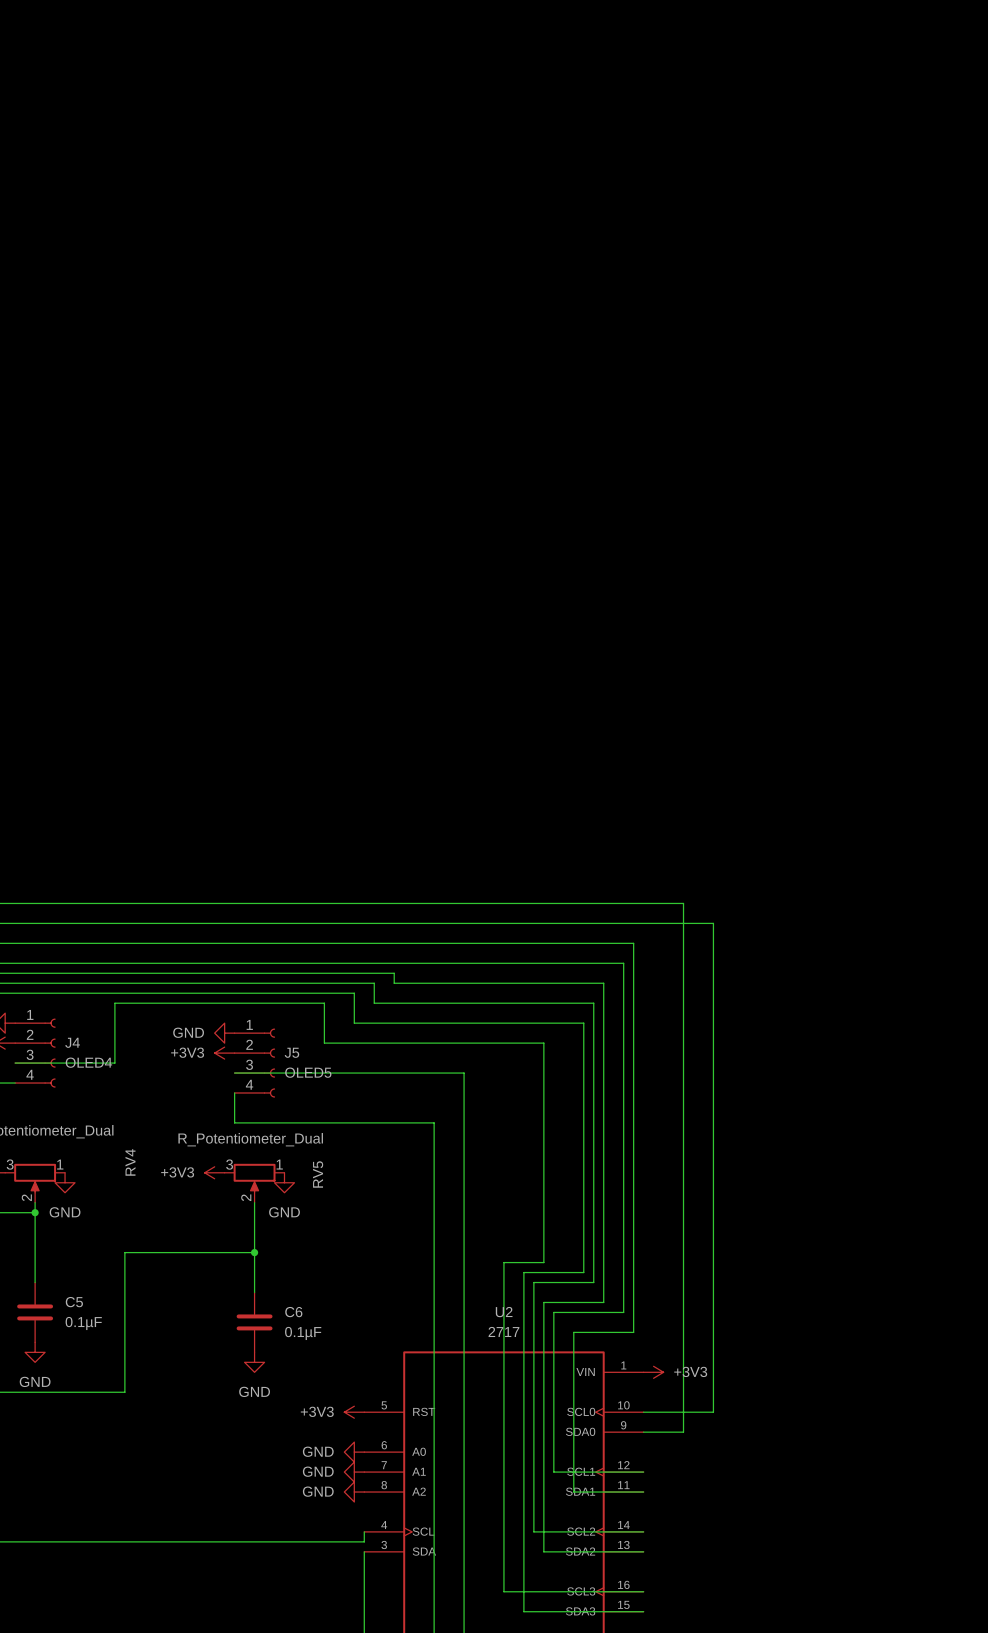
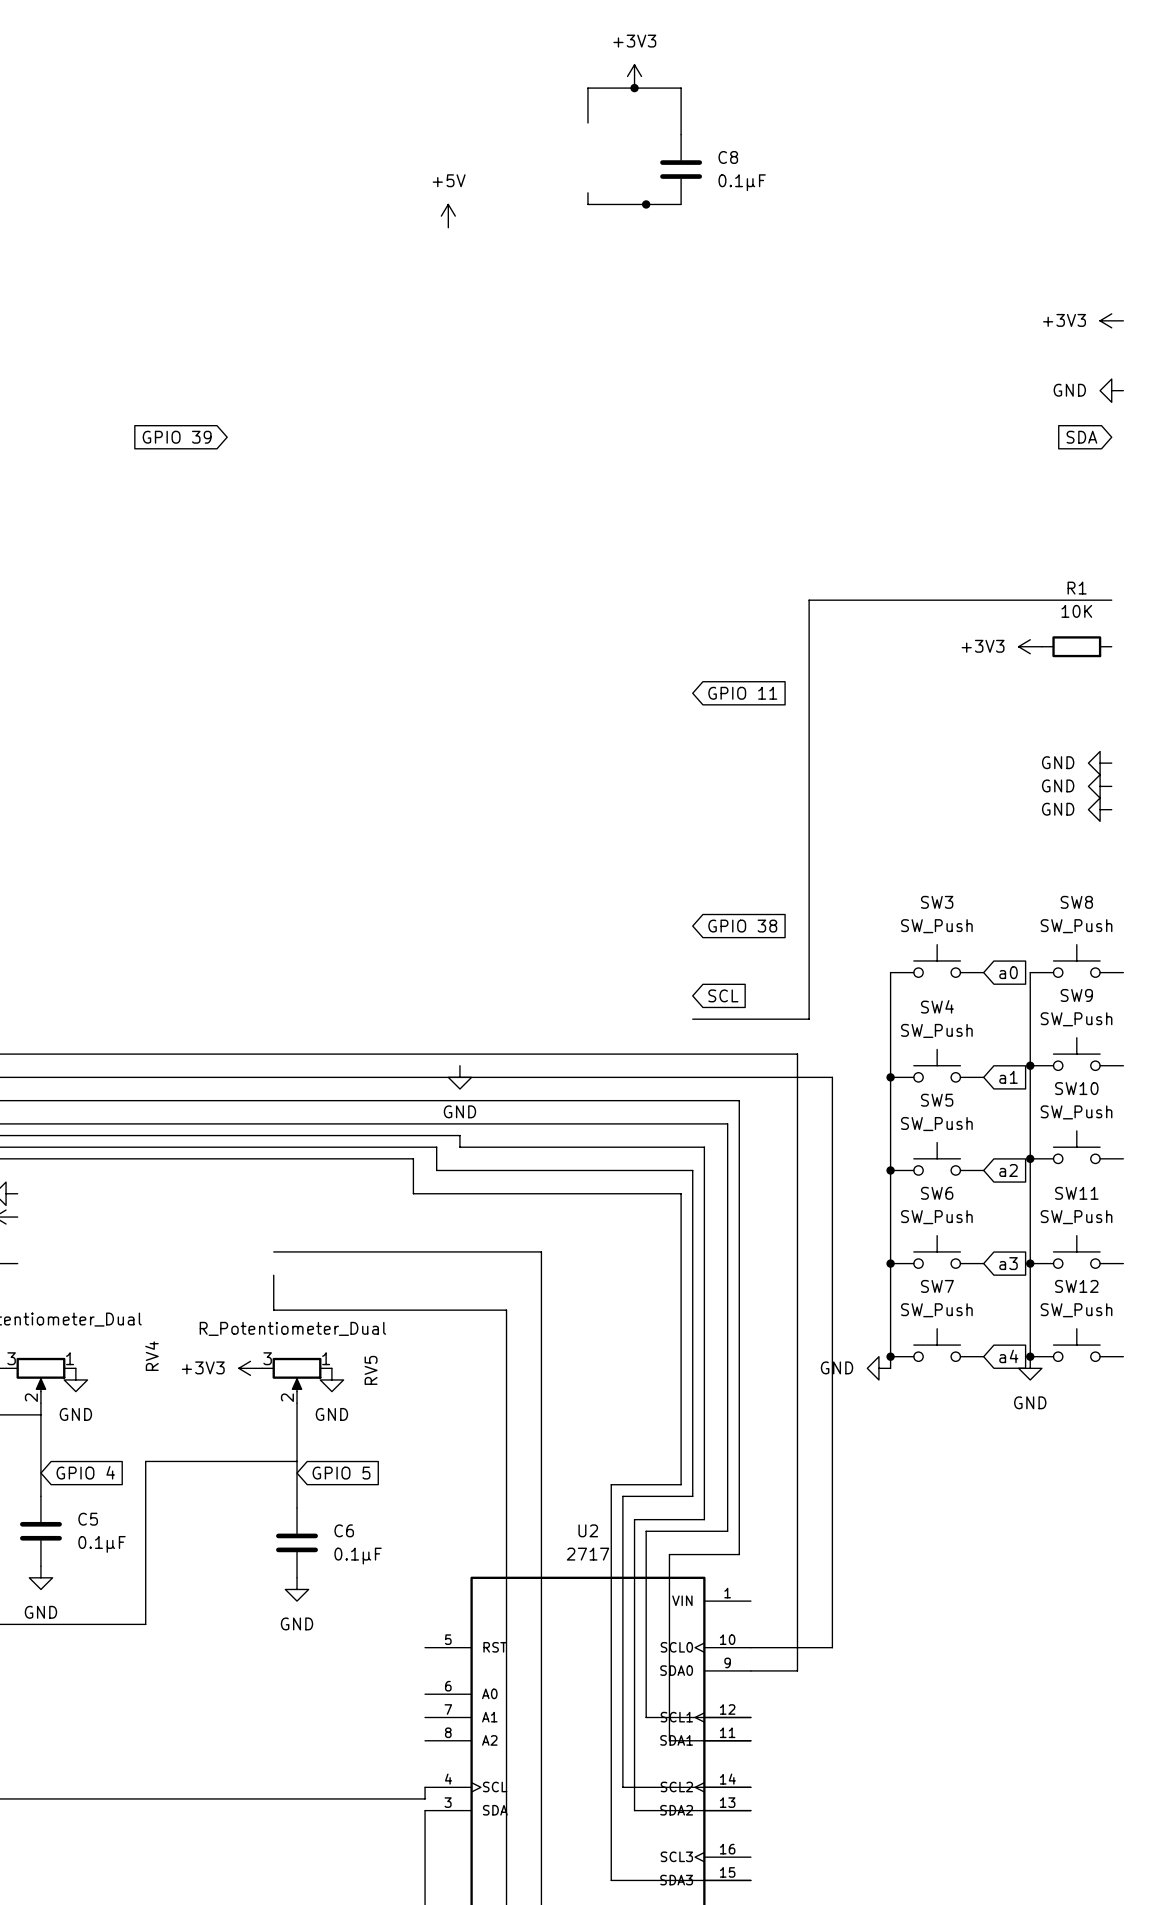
power symbol: none -> +3V3 (634, 76)
junction: none -> (634, 88)
wire: none -> (587, 122) (587, 88) (681, 88) (681, 134)
C8: none -> 0.1µF (681, 169)
wire: none -> (587, 192) (587, 204) (681, 204)
junction: none -> (646, 204)
power symbol: none -> +5V (448, 216)
power symbol: none -> +3V3 (1111, 320)
power symbol: none -> GND (1111, 390)
global label: none -> GPIO 39 (177, 437)
global label: none -> SDA (1081, 437)
wire: none -> (1111, 600) (809, 600) (809, 1019) (692, 1019)
power symbol: none -> +3V3 (1030, 646)
R1: none -> 10K (1076, 646)
global label: none -> GPIO 11 (742, 693)
power symbol: none -> GND (1100, 763)
power symbol: none -> GND (1100, 786)
power symbol: none -> GND (1100, 809)
global label: none -> GPIO 38 (742, 926)
SW3: none -> SW_Push (937, 960)
SW8: none -> SW_Push (1076, 960)
wire: none -> (890, 972) (890, 1368)
global label: none -> a0 (1008, 972)
wire: none -> (1030, 972) (1030, 1356)
global label: none -> SCL (723, 995)
SW9: none -> SW_Push (1076, 1054)
SW4: none -> SW_Push (937, 1065)
junction: none -> (1030, 1065)
power symbol: none -> GND (459, 1077)
junction: none -> (890, 1077)
global label: none -> a1 (1008, 1077)
SW10: none -> SW_Push (1076, 1147)
SW5: none -> SW_Push (937, 1158)
junction: none -> (1030, 1158)
junction: none -> (890, 1170)
global label: none -> a2 (1008, 1170)
power symbol: GND (224, 1033) -> none
J4: OLED4 (35, 1053) -> none
power symbol: +3V3 (224, 1053) -> none
wire: (15, 1063) (114, 1063) (114, 1003) (324, 1003) (324, 1043) (543, 1043) (543, 1262) (503, 1262) (503, 1591) (643, 1591) -> none
J5: OLED5 (254, 1063) -> none
SW6: none -> SW_Push (937, 1251)
SW11: none -> SW_Push (1076, 1251)
junction: none -> (890, 1263)
global label: none -> a3 (1008, 1263)
junction: none -> (1030, 1263)
SW7: none -> SW_Push (937, 1345)
SW12: none -> SW_Push (1076, 1345)
junction: none -> (890, 1356)
global label: none -> a4 (1008, 1356)
junction: none -> (1030, 1356)
power symbol: none -> GND (878, 1368)
power symbol: none -> GND (1030, 1368)
junction: (35, 1212) -> none
junction: (254, 1252) -> none
global label: none -> GPIO 4 (85, 1472)
global label: none -> GPIO 5 (341, 1473)
power symbol: +3V3 (653, 1372) -> none
power symbol: +3V3 (354, 1412) -> none
power symbol: GND (354, 1452) -> none
power symbol: GND (354, 1472) -> none
power symbol: GND (354, 1492) -> none

